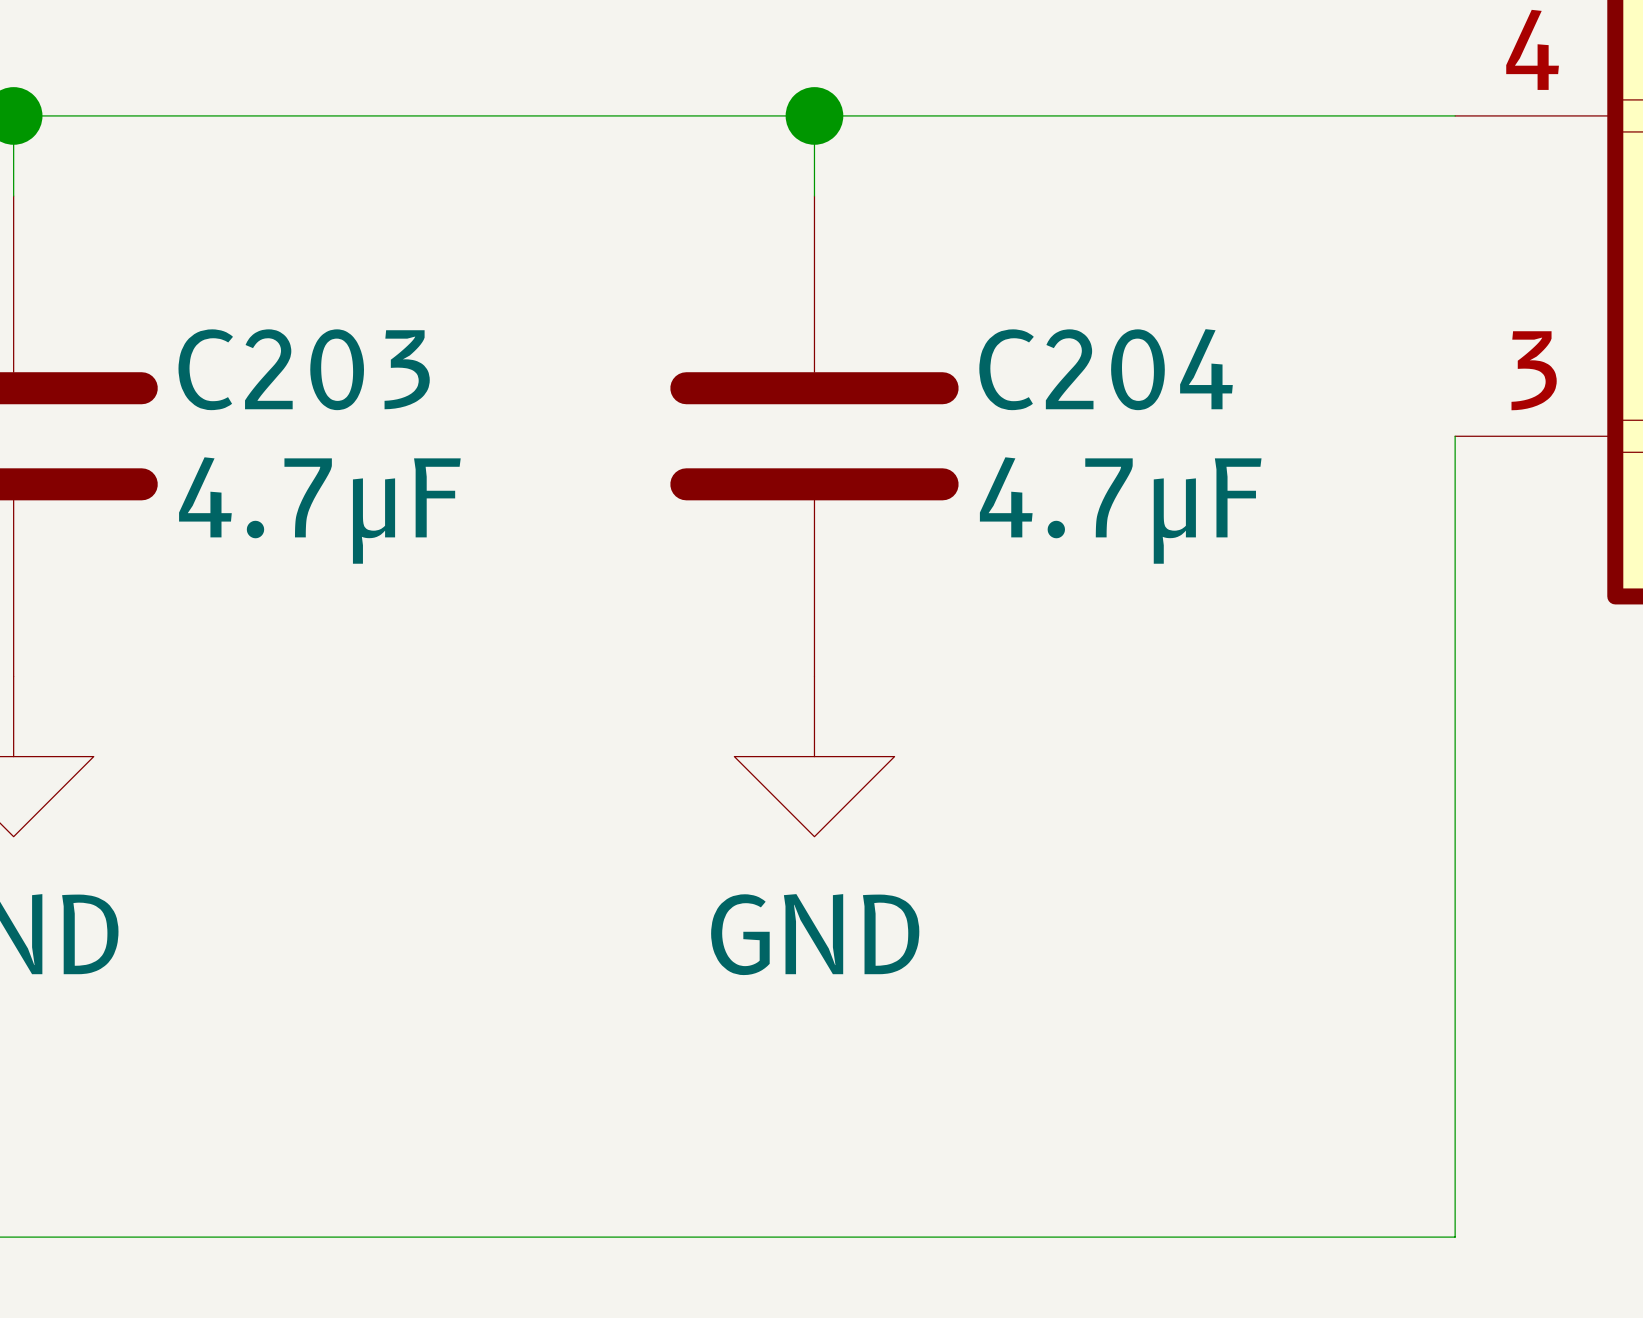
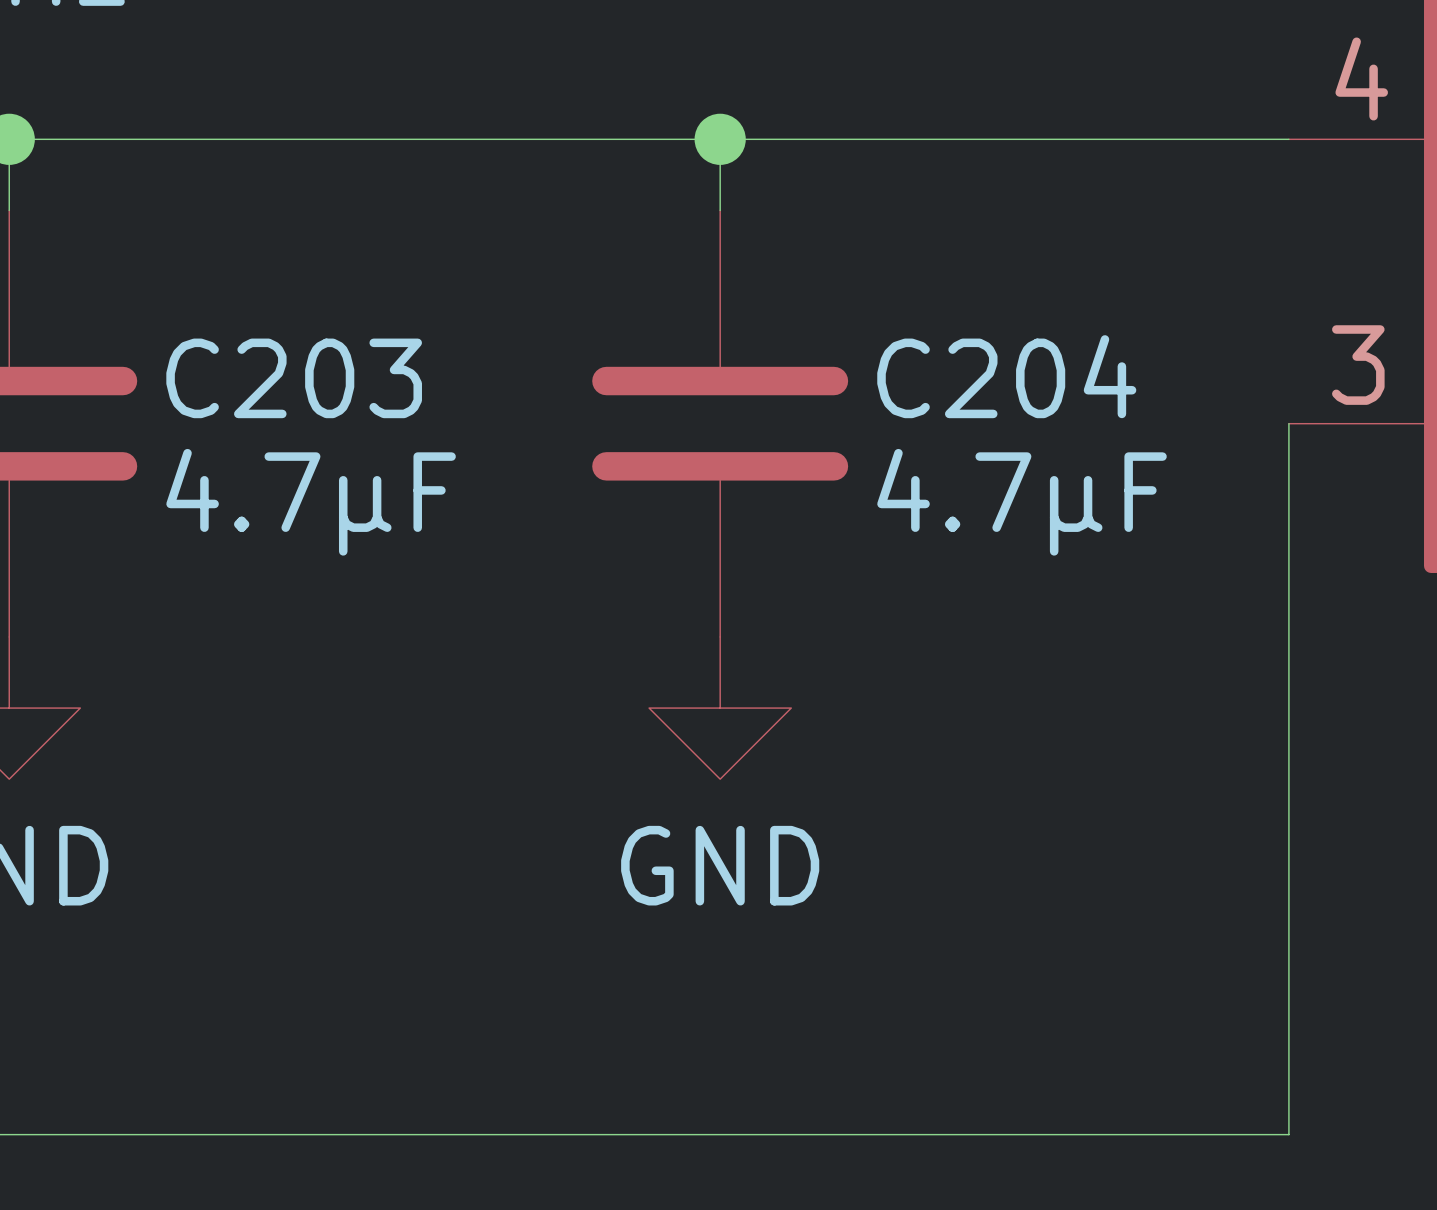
C203 name position: C203 (304, 369) -> C203 (294, 378)
C204 name position: C204 (1106, 369) -> C204 (1006, 376)
C203 value position: 4.7μF (319, 510) -> 4.7μF (311, 502)
C204 value position: 4.7μF (1120, 510) -> 4.7μF (1022, 502)

